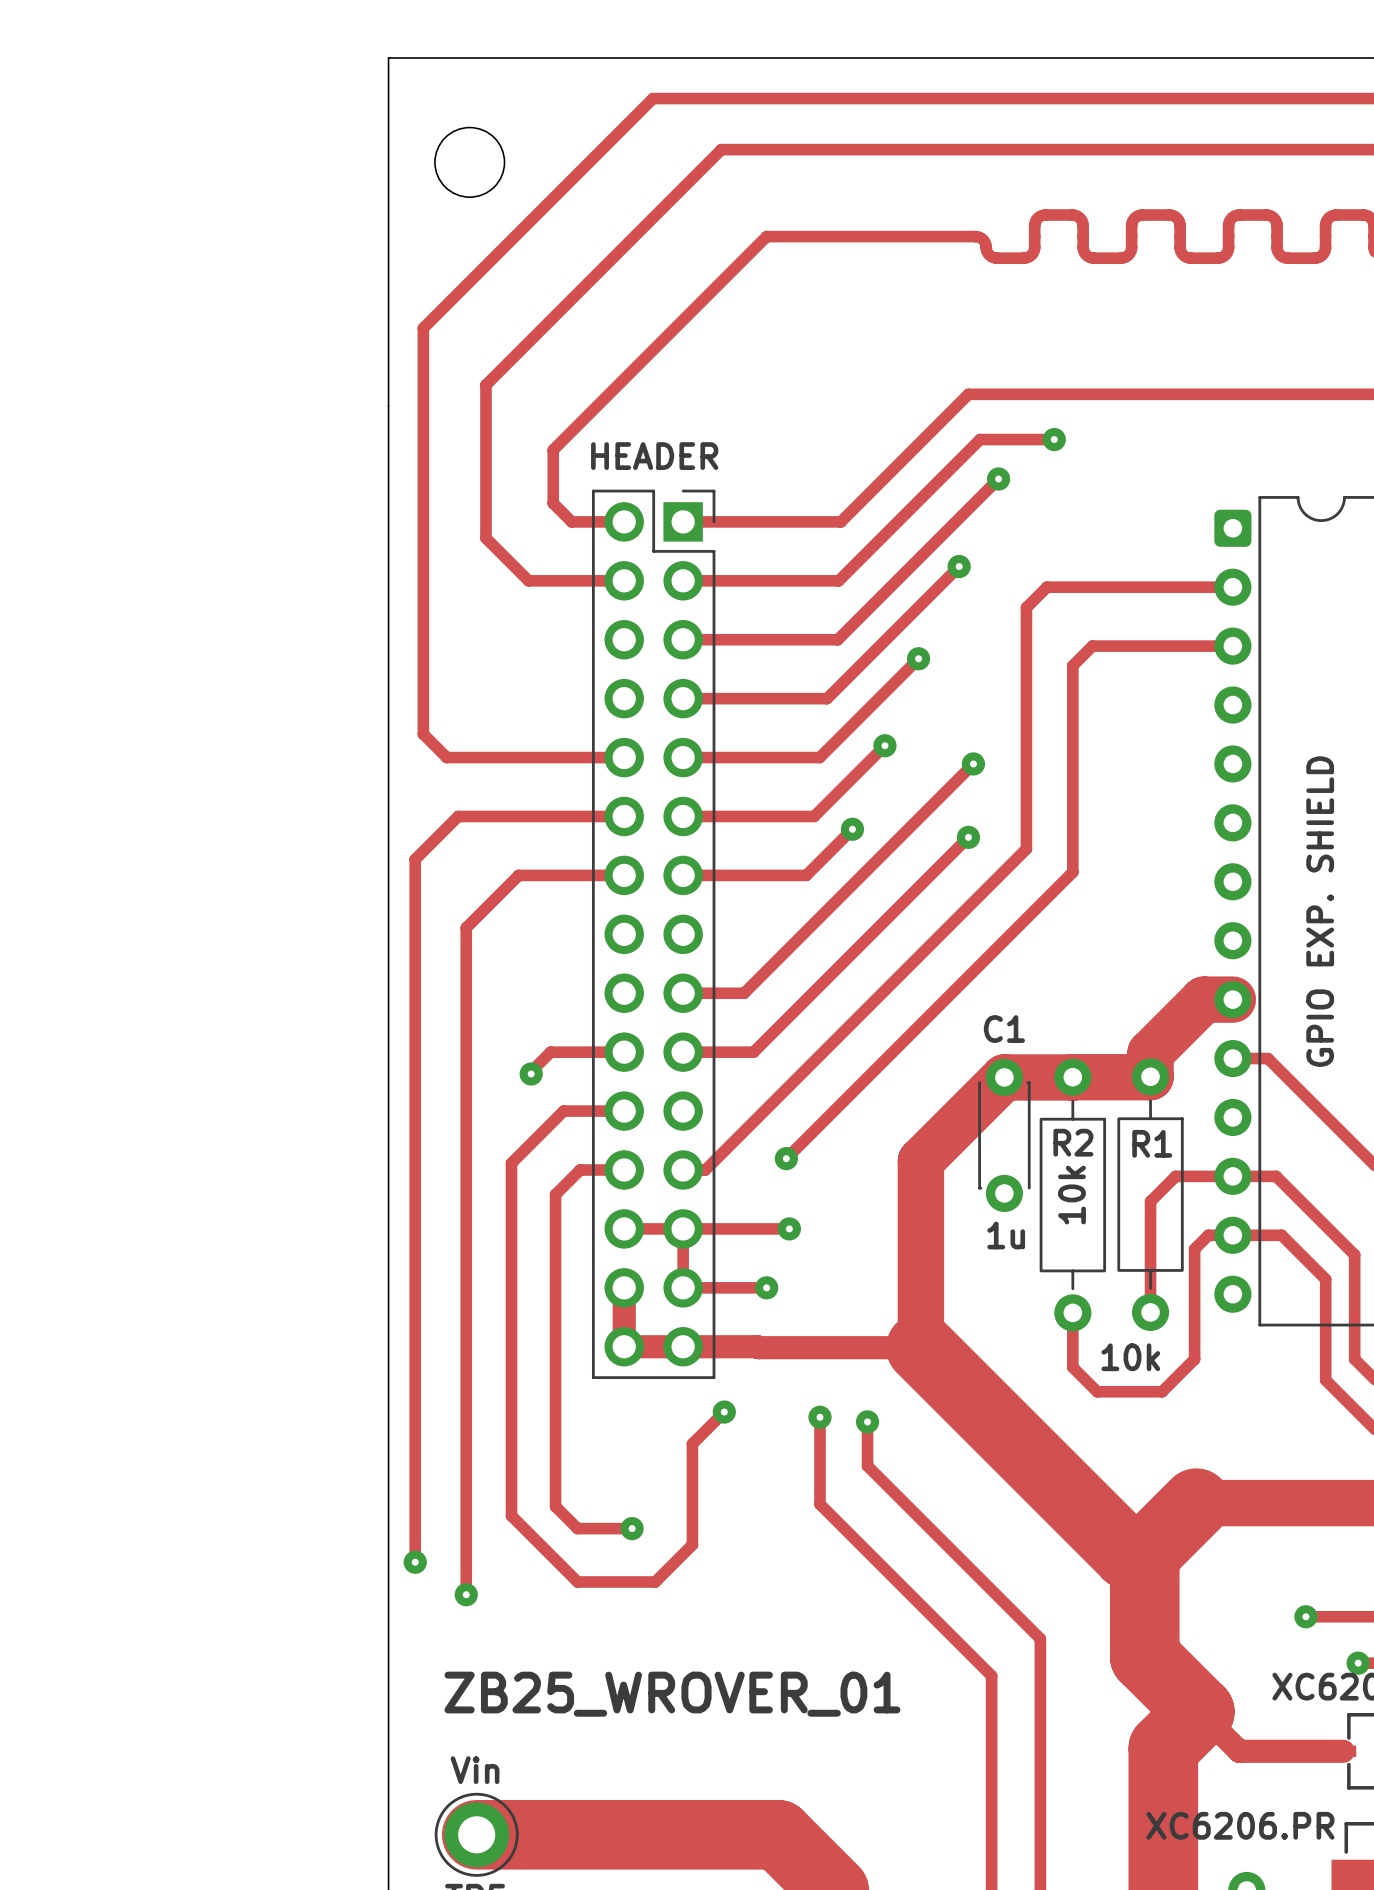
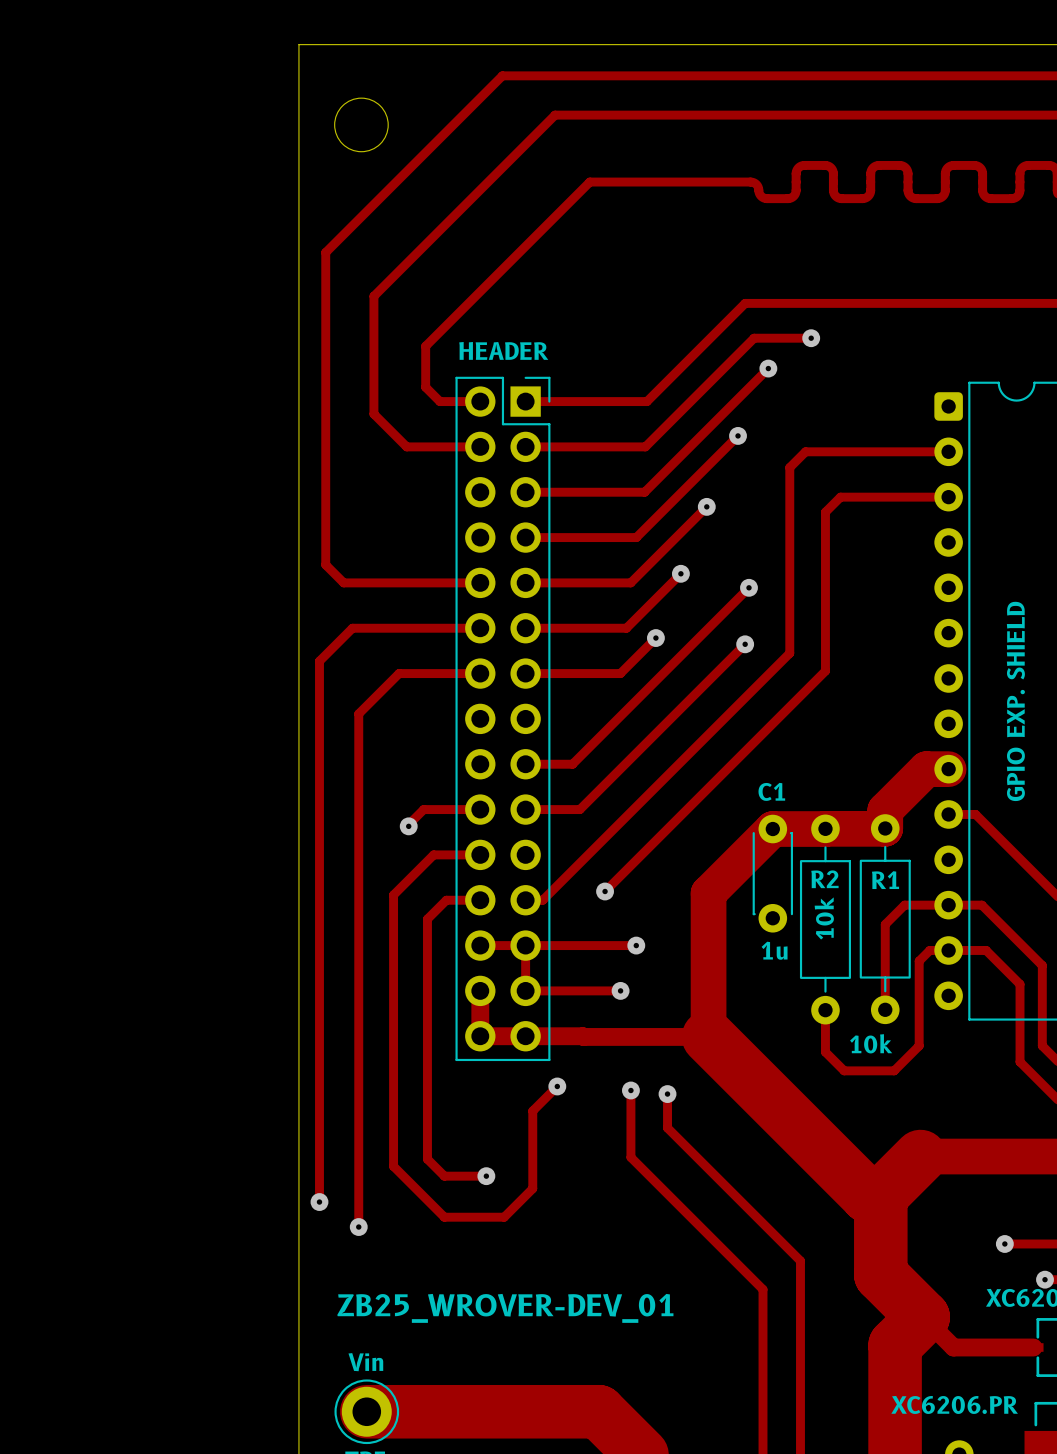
track: none -> (607, 945) (636, 945)
via: (789, 1228) -> none
via: none -> (636, 945)
track: none -> (589, 990) (620, 990)
via: (766, 1287) -> none
via: none -> (620, 990)
text: ZB25_WROVER_01 (672, 1694) -> ZB25_WROVER-DEV_01 (505, 1308)

